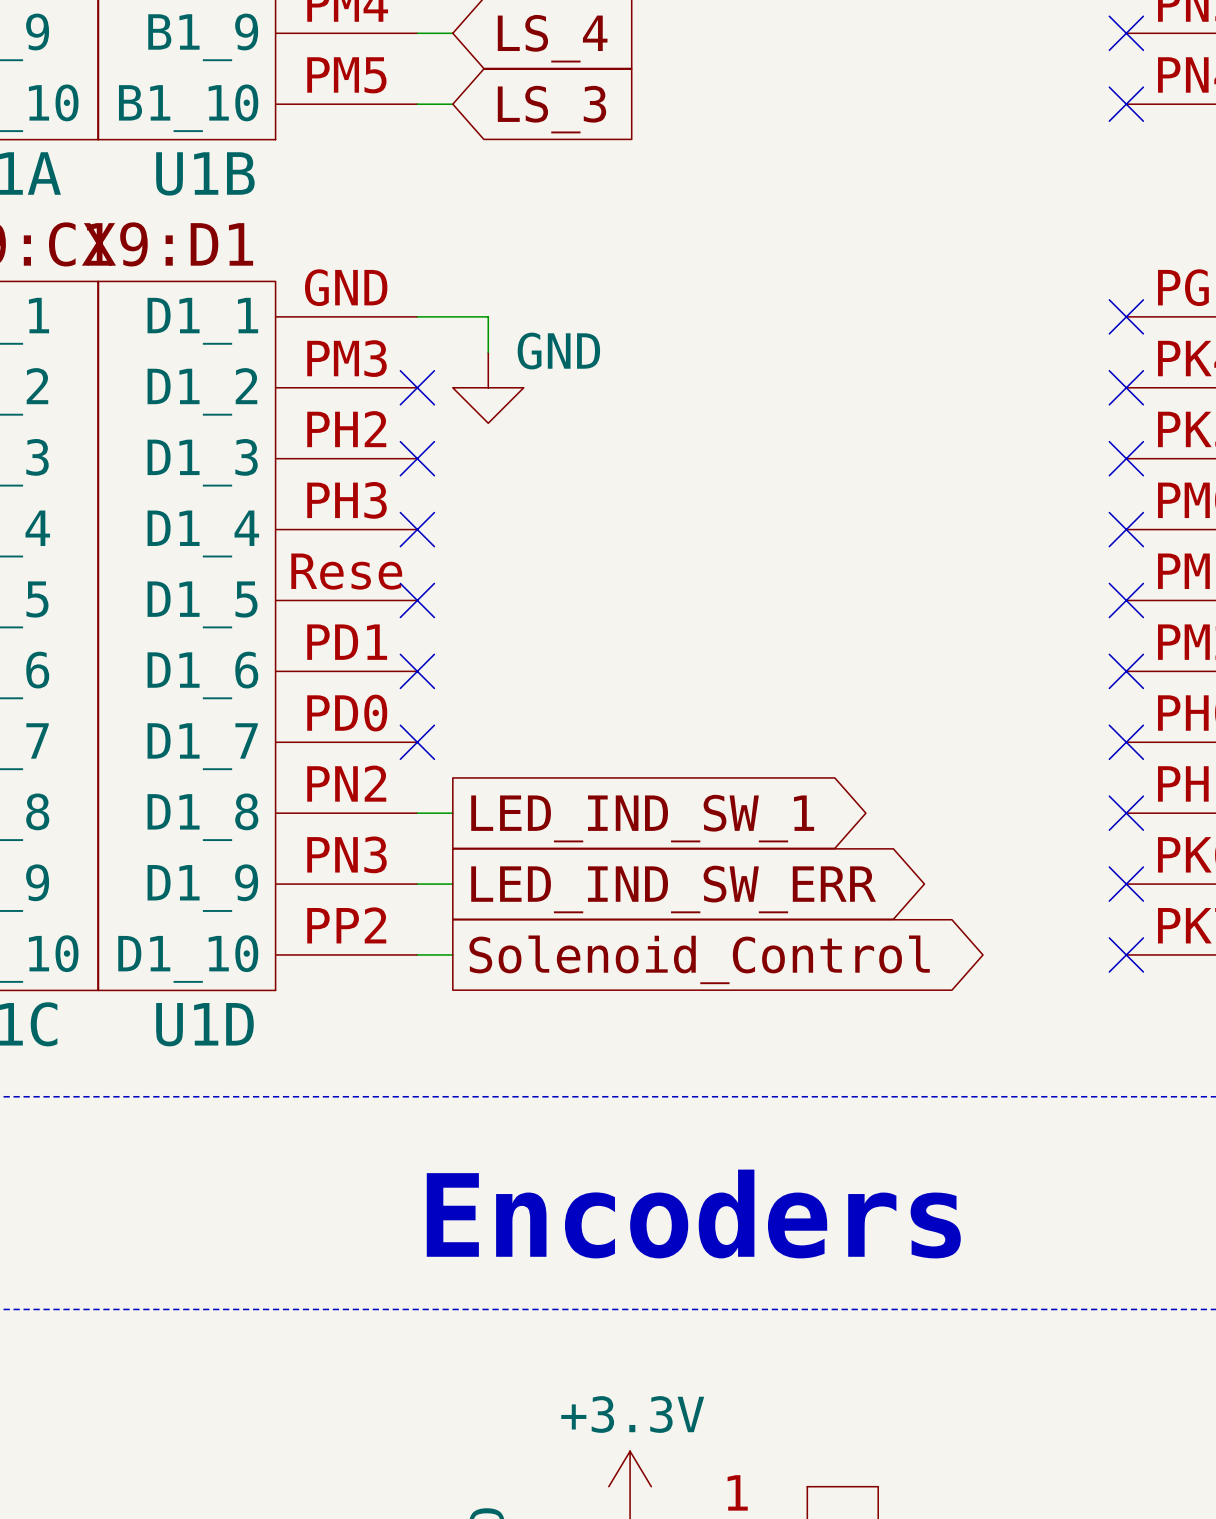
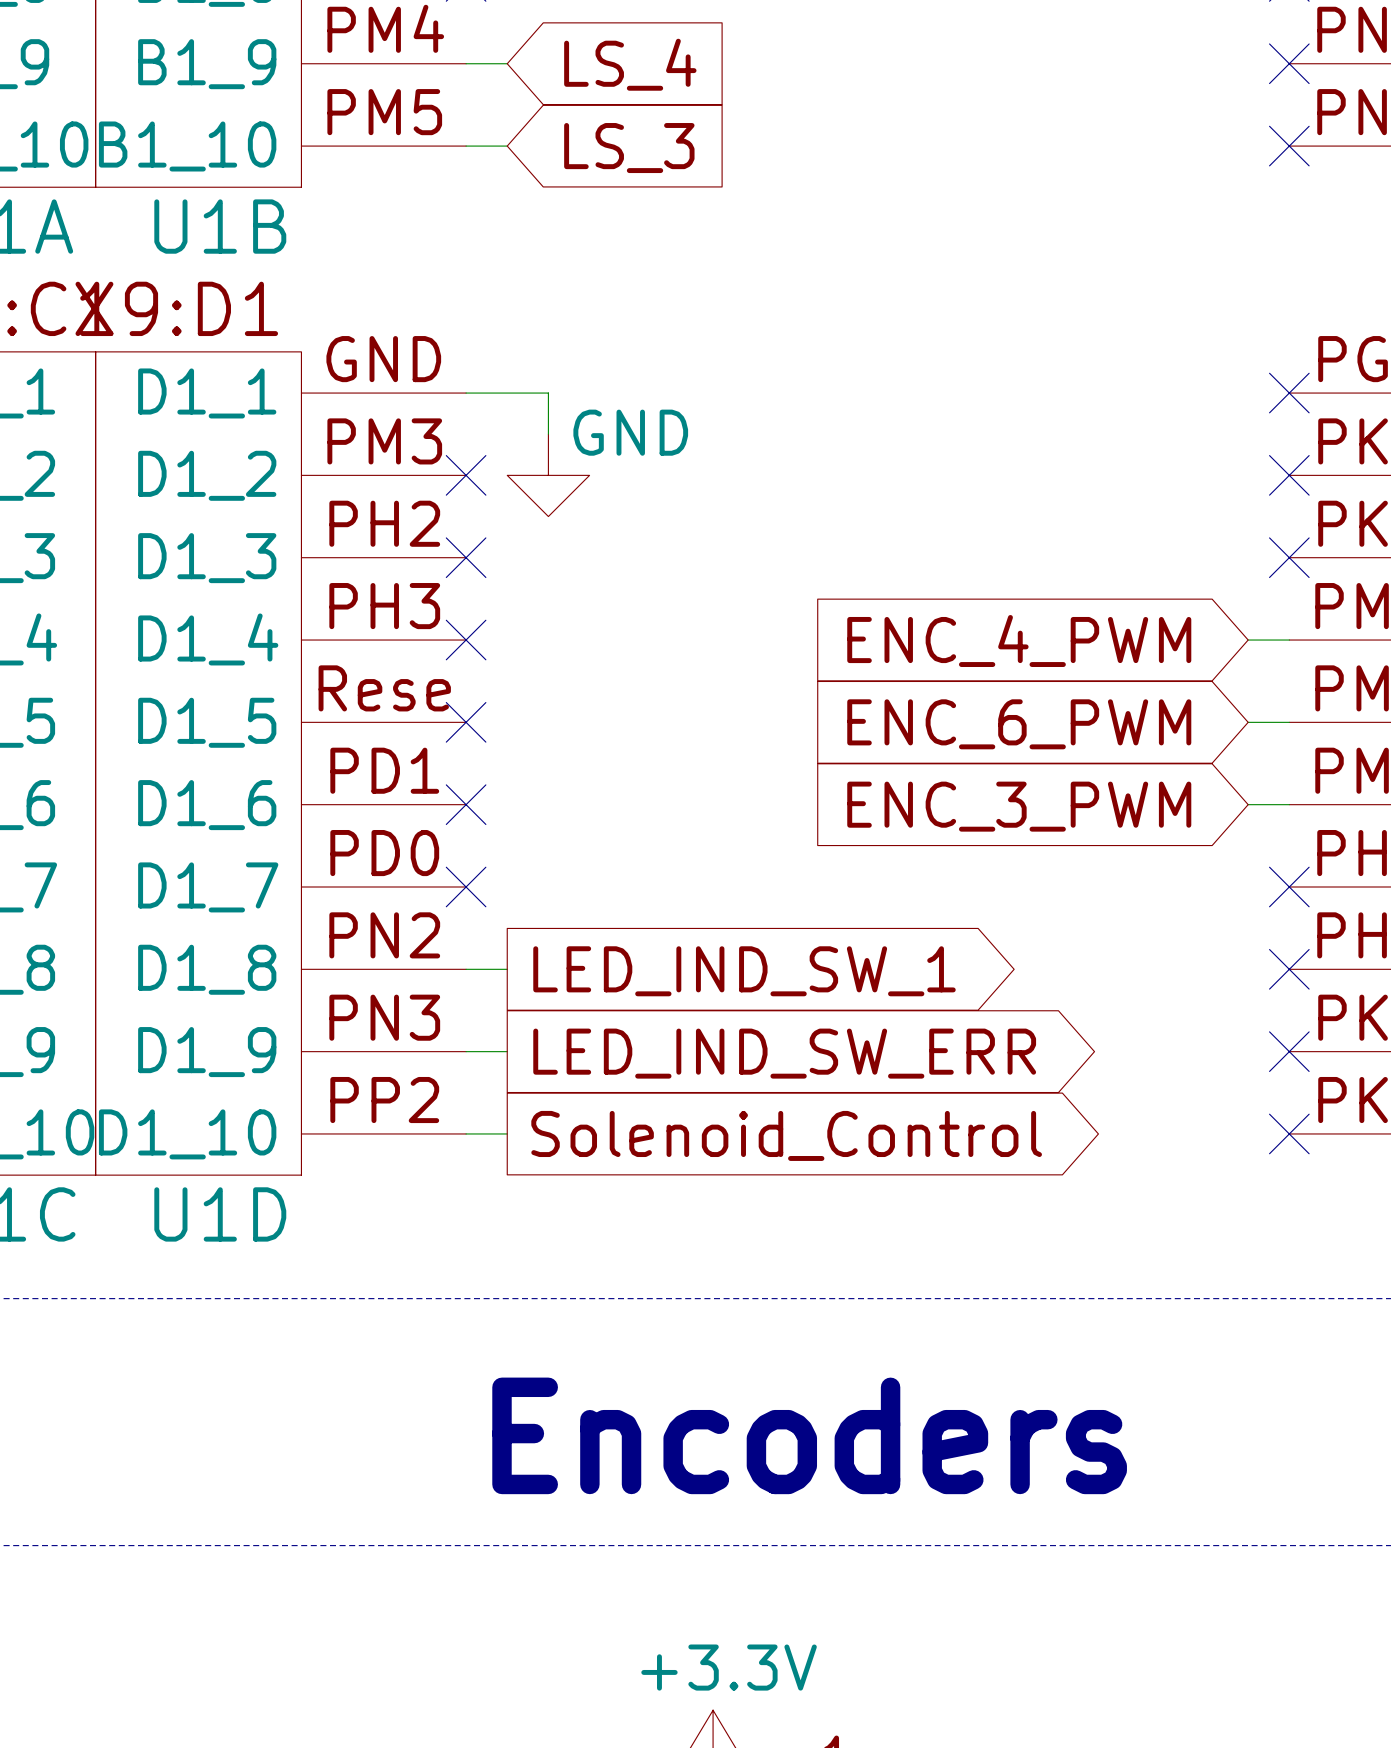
wire: none -> (1248, 640) (1289, 640)
no-connect mark: (1126, 529) -> none
global label: none -> ENC_4_PWM (1019, 641)
wire: none -> (1248, 722) (1289, 722)
no-connect mark: (1126, 600) -> none
global label: none -> ENC_6_PWM (1019, 724)
wire: none -> (1248, 804) (1289, 804)
no-connect mark: (1126, 671) -> none
global label: none -> ENC_3_PWM (1019, 806)

